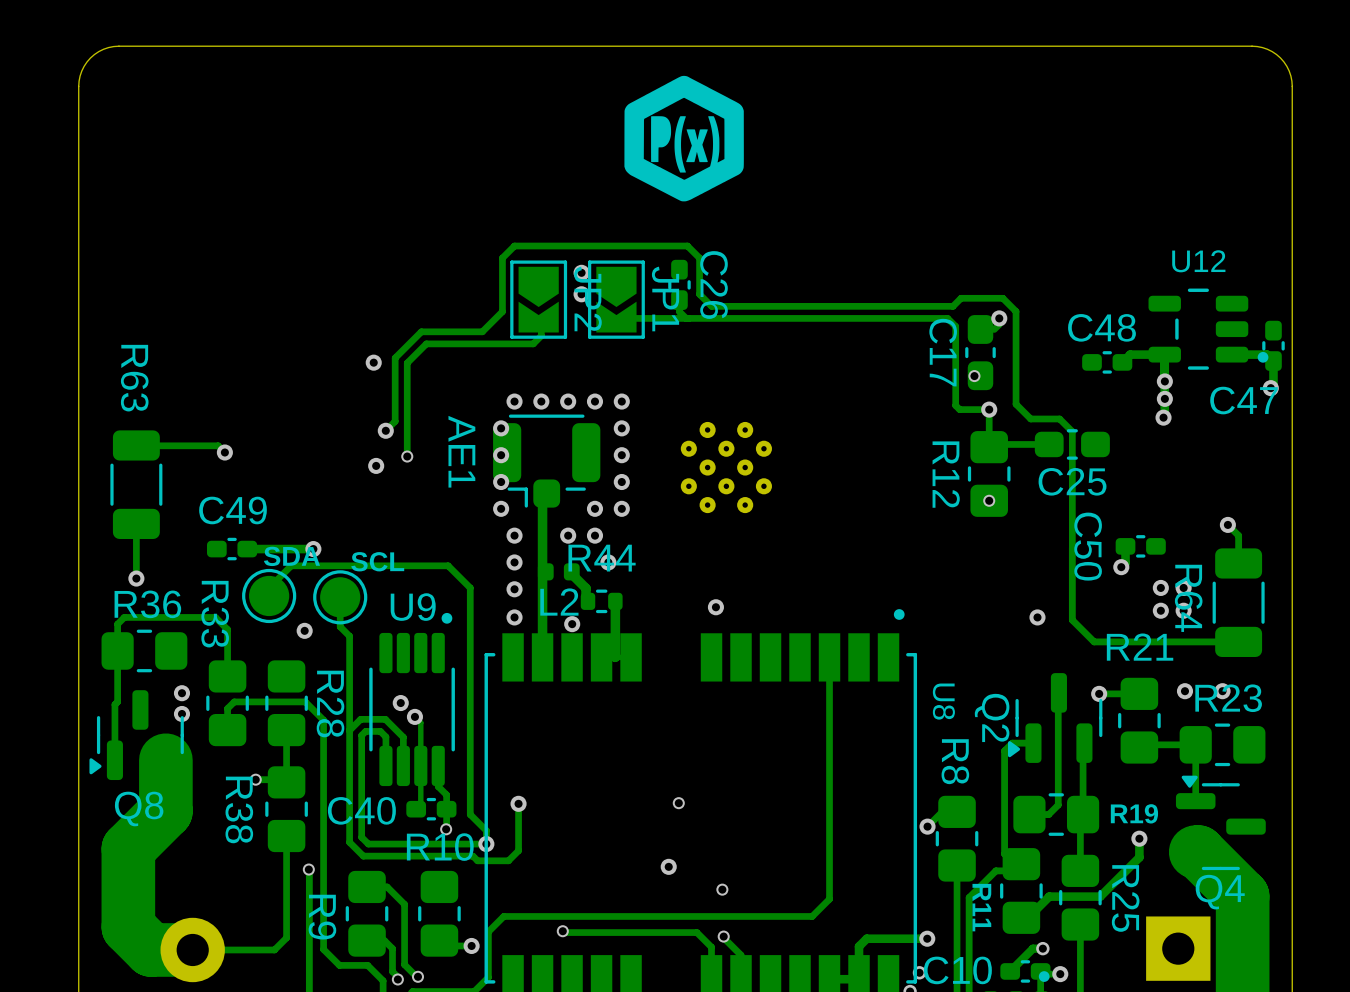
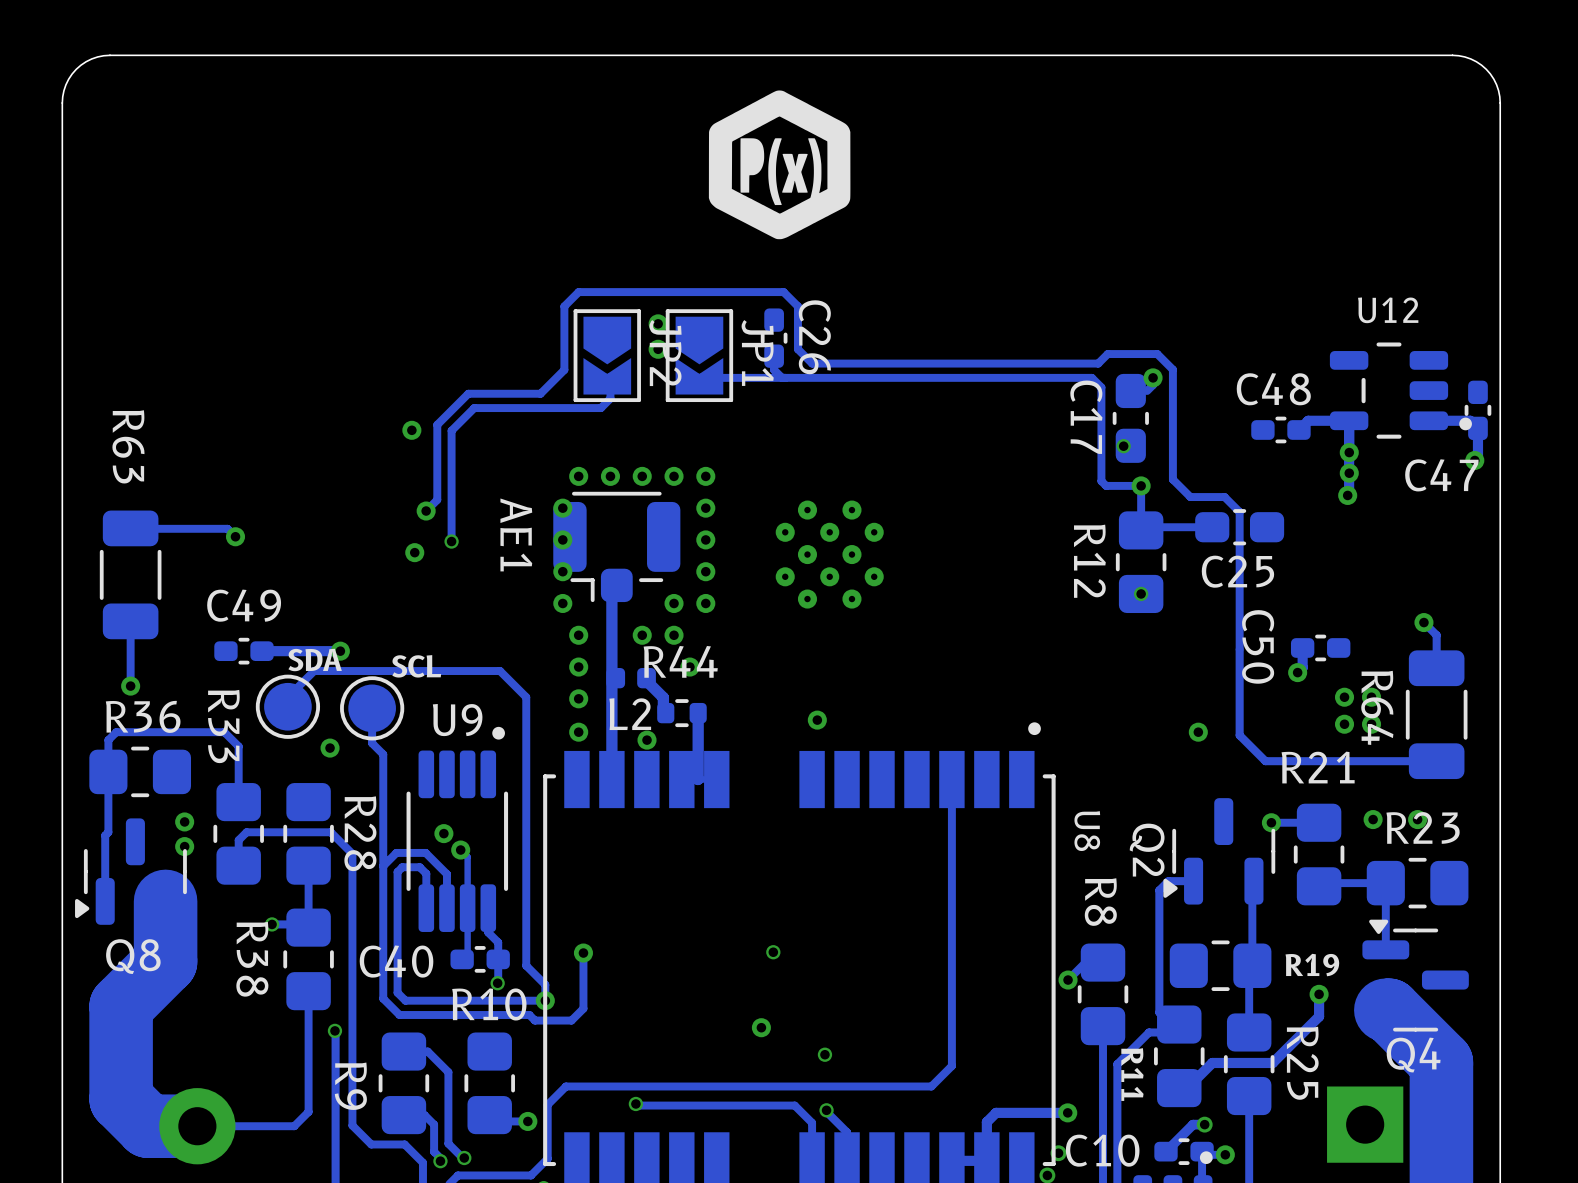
track: (1058, 693) (1058, 805) (1048, 814) (1029, 814) -> none

